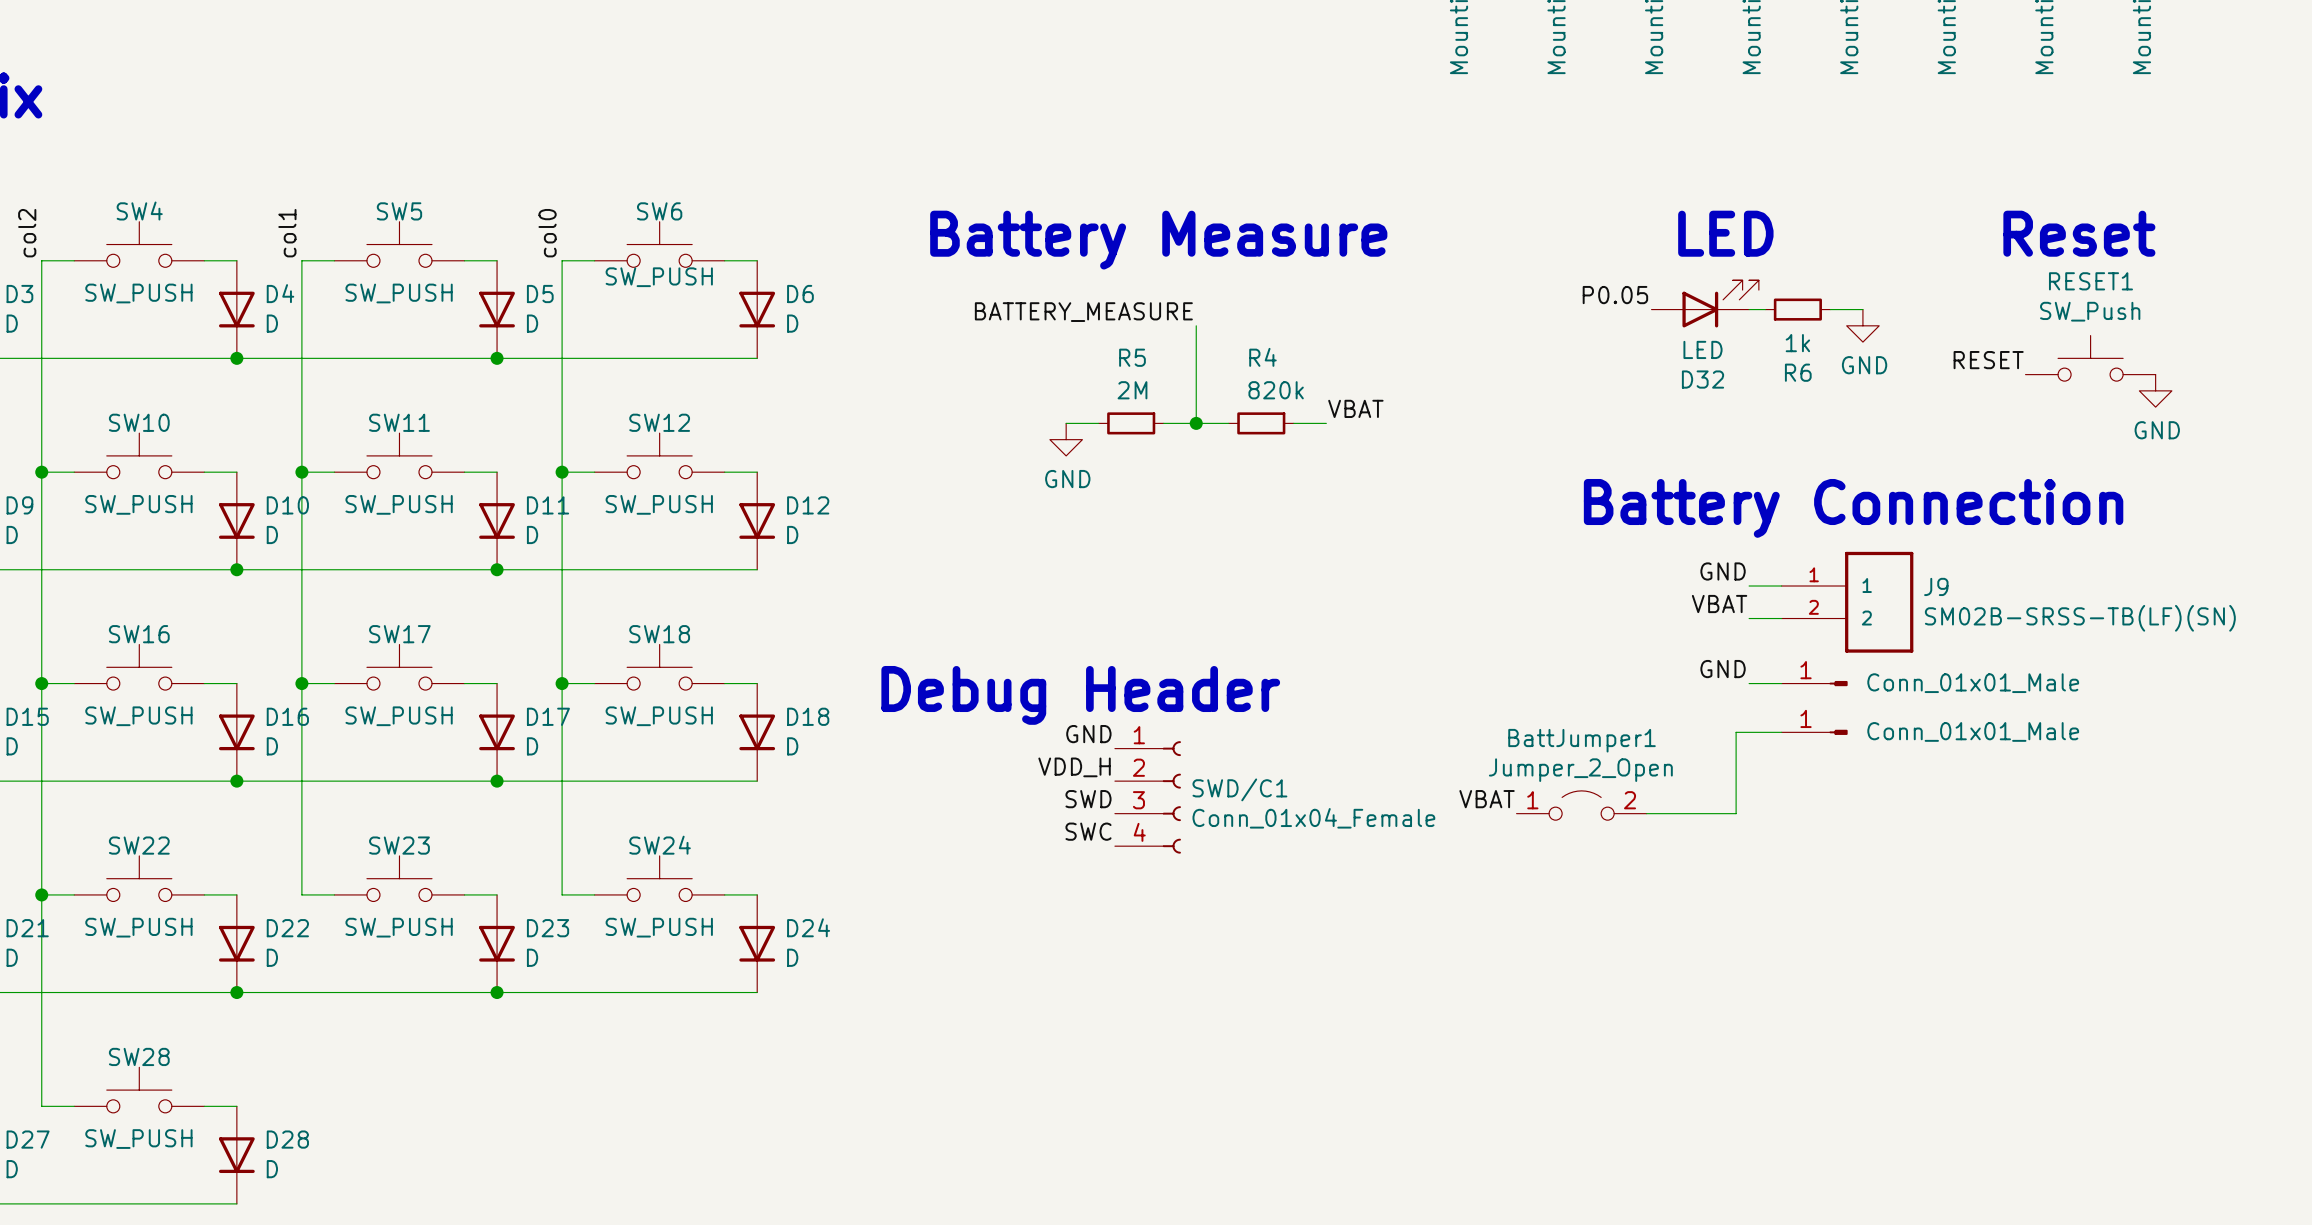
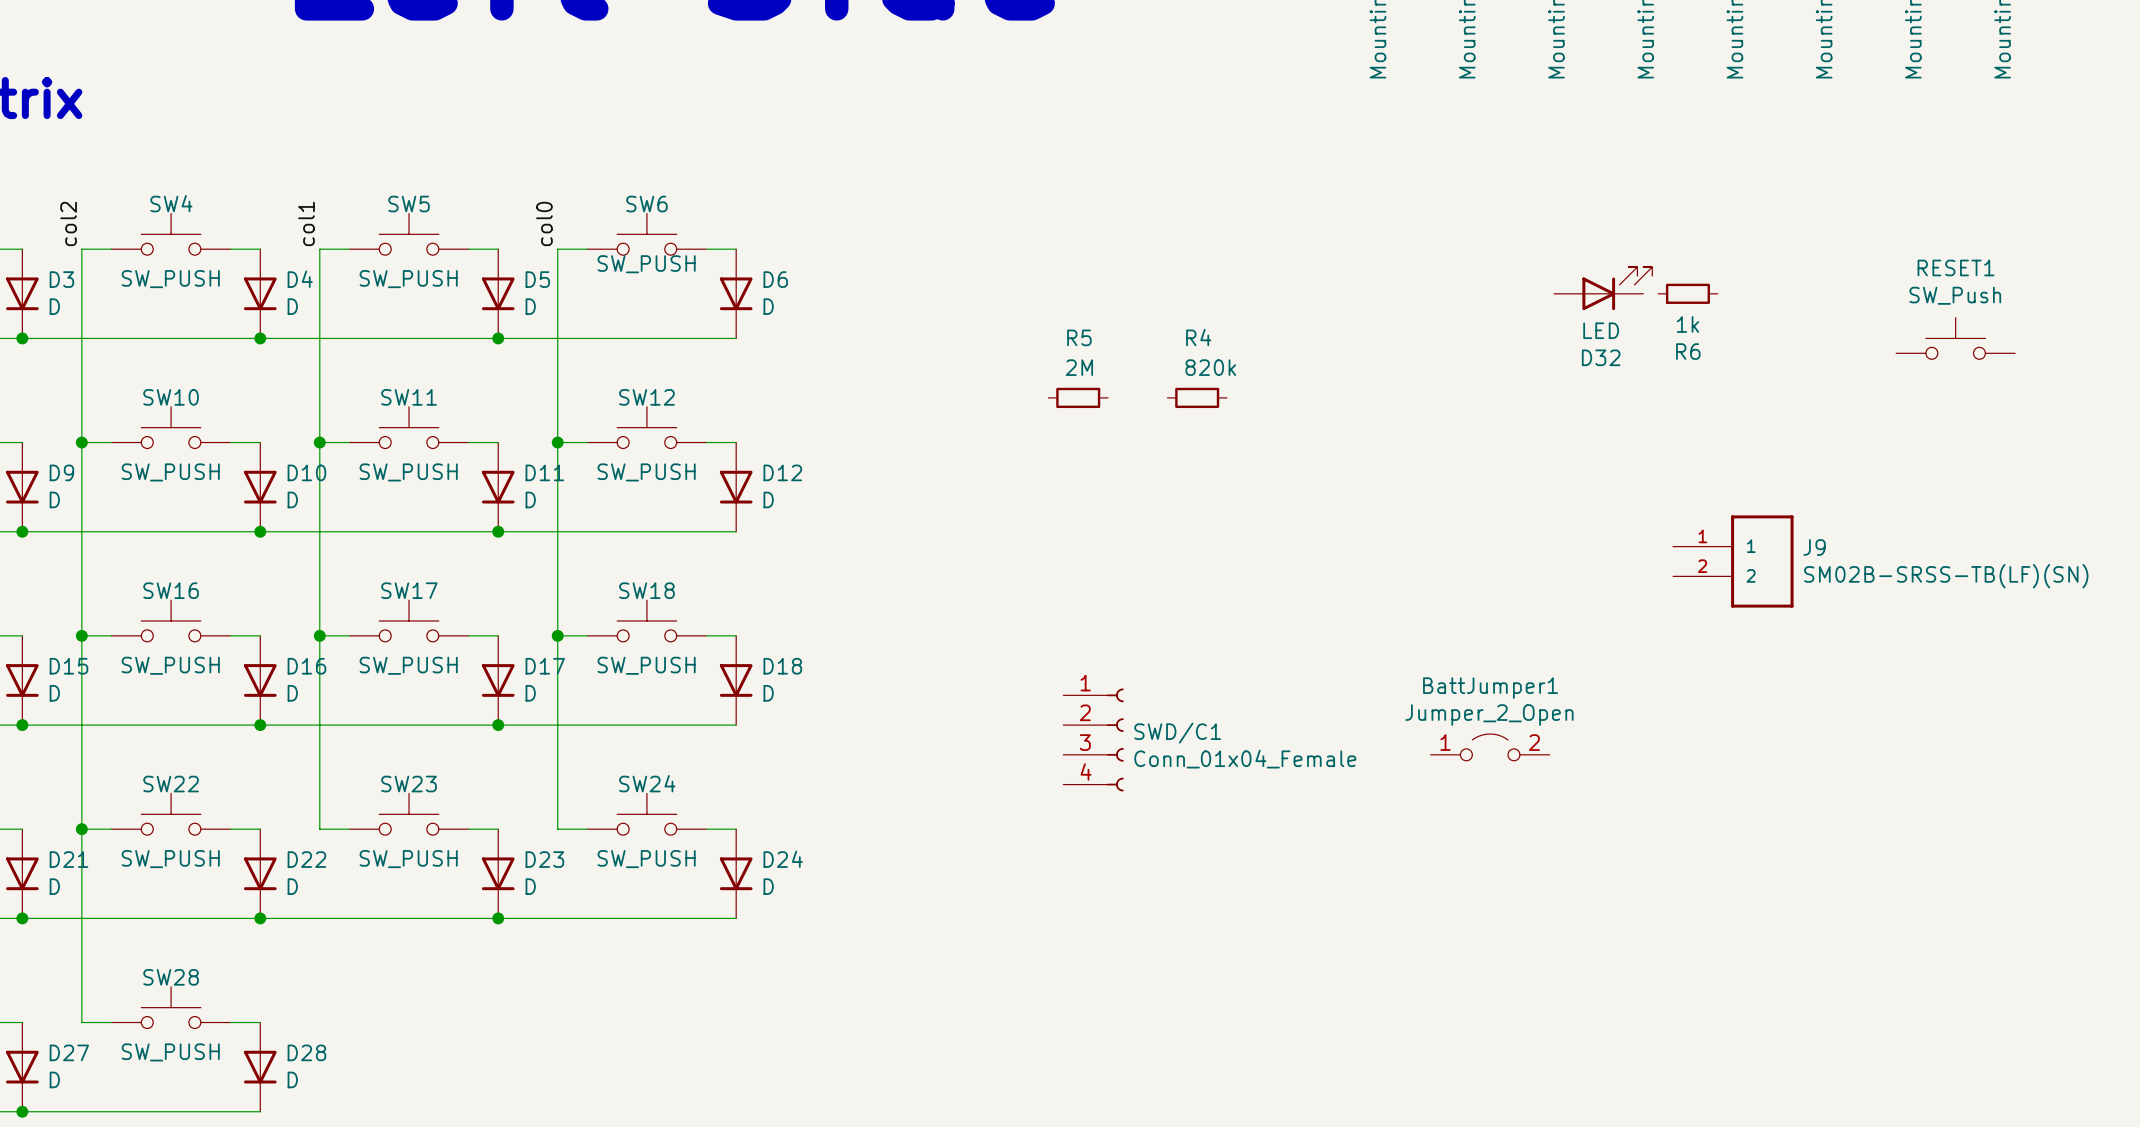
text: LED (1725, 233) -> none
text: Reset (2079, 233) -> none
text: Battery Measure (1158, 240) -> none
label: P0.05 (1615, 295) -> none
wire: (1749, 309) (1765, 309) -> none
wire: (1830, 309) (1862, 309) -> none
label: BATTERY_MEASURE (1083, 312) -> none
wire: (1196, 325) (1196, 423) -> none
power symbol: GND (1862, 325) -> none
label: RESET (1988, 360) -> none
power symbol: GND (2155, 390) -> none
label: VBAT (1355, 408) -> none
wire: (1066, 423) (1098, 423) -> none
wire: (1163, 423) (1228, 423) -> none
junction: (1196, 423) -> none
wire: (1293, 423) (1326, 423) -> none
power symbol: GND (1066, 439) -> none
text: Battery Connection (1853, 508) -> none
label: GND (1723, 571) -> none
wire: (1749, 586) (1781, 586) -> none
label: VBAT (1719, 604) -> none
wire: (1749, 618) (1781, 618) -> none
label: GND (1723, 669) -> none
wire: (1749, 683) (1781, 683) -> none
part: Conn_01x01_Male (1814, 683) -> none
text: Debug Header (1080, 695) -> none
wire: (1781, 732) (1736, 732) (1736, 813) (1646, 813) -> none
part: Conn_01x01_Male (1814, 732) -> none
label: GND (1088, 734) -> none
label: VDD_H (1074, 767) -> none
label: SWD (1088, 799) -> none
label: VBAT (1487, 799) -> none
label: SWC (1088, 831) -> none

